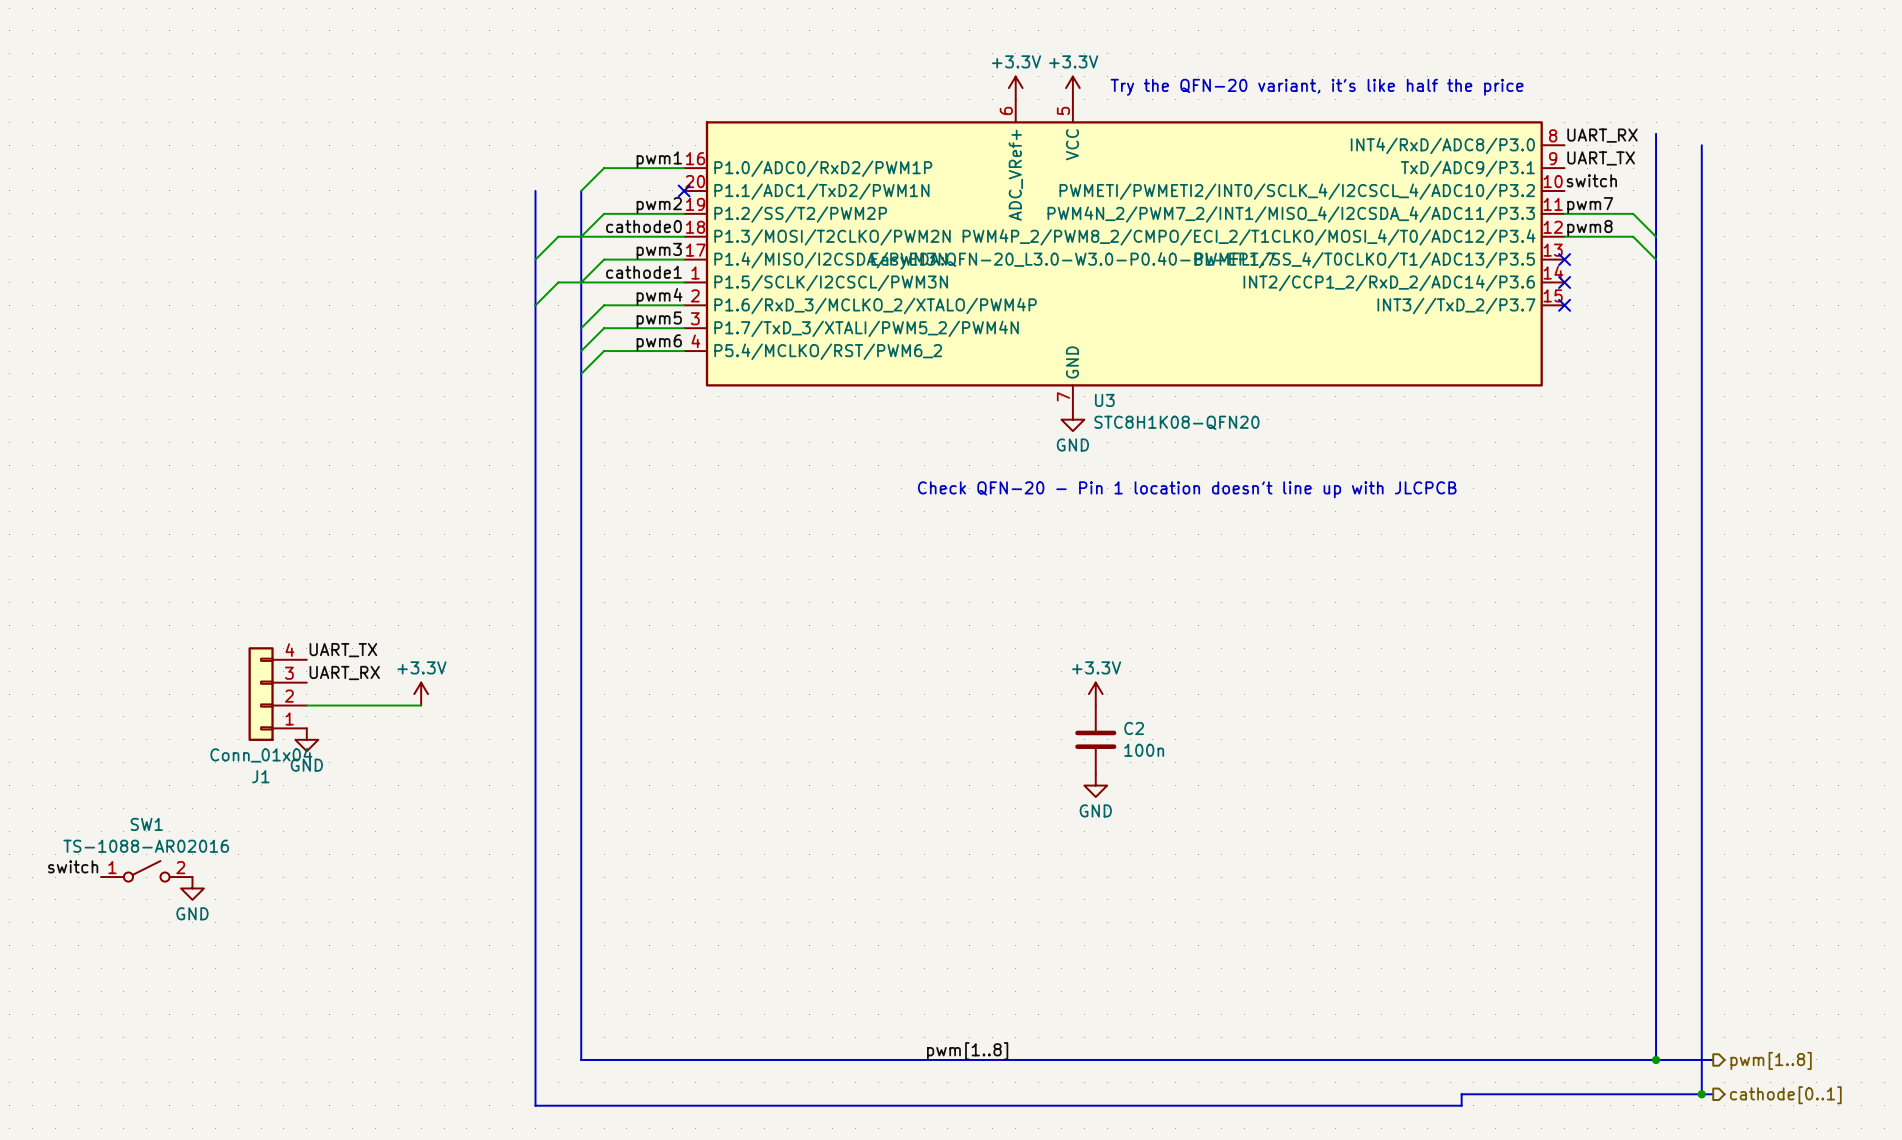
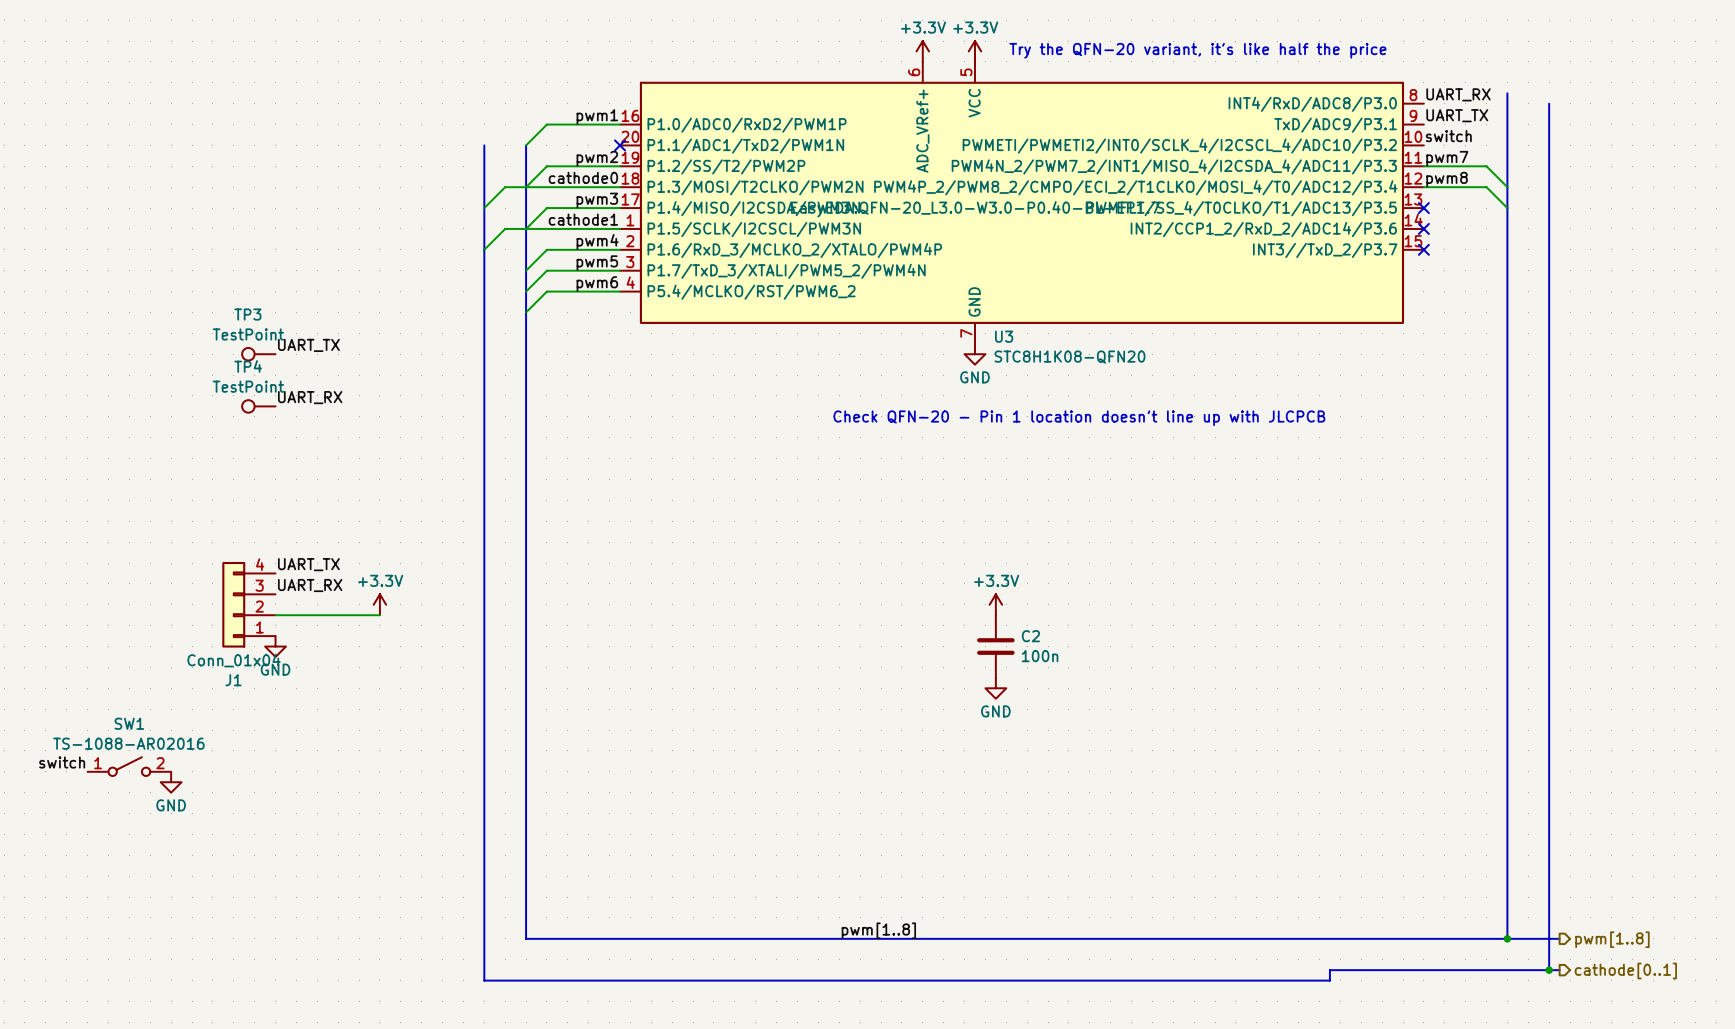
label: none -> UART_TX (308, 345)
TP3: none -> TestPoint (258, 354)
label: none -> UART_RX (310, 397)
TP4: none -> TestPoint (258, 406)

